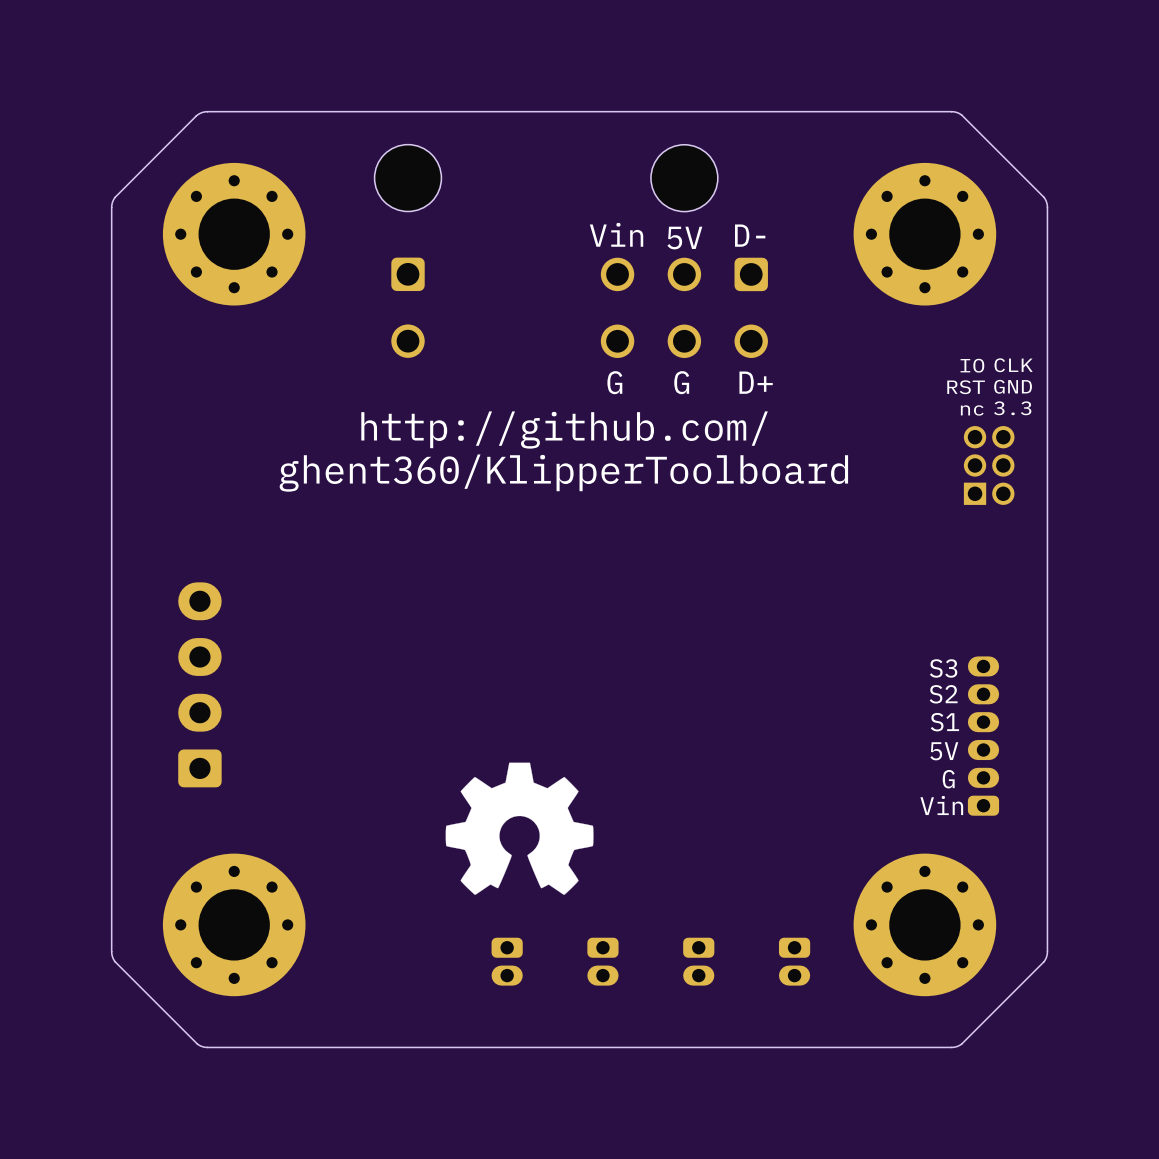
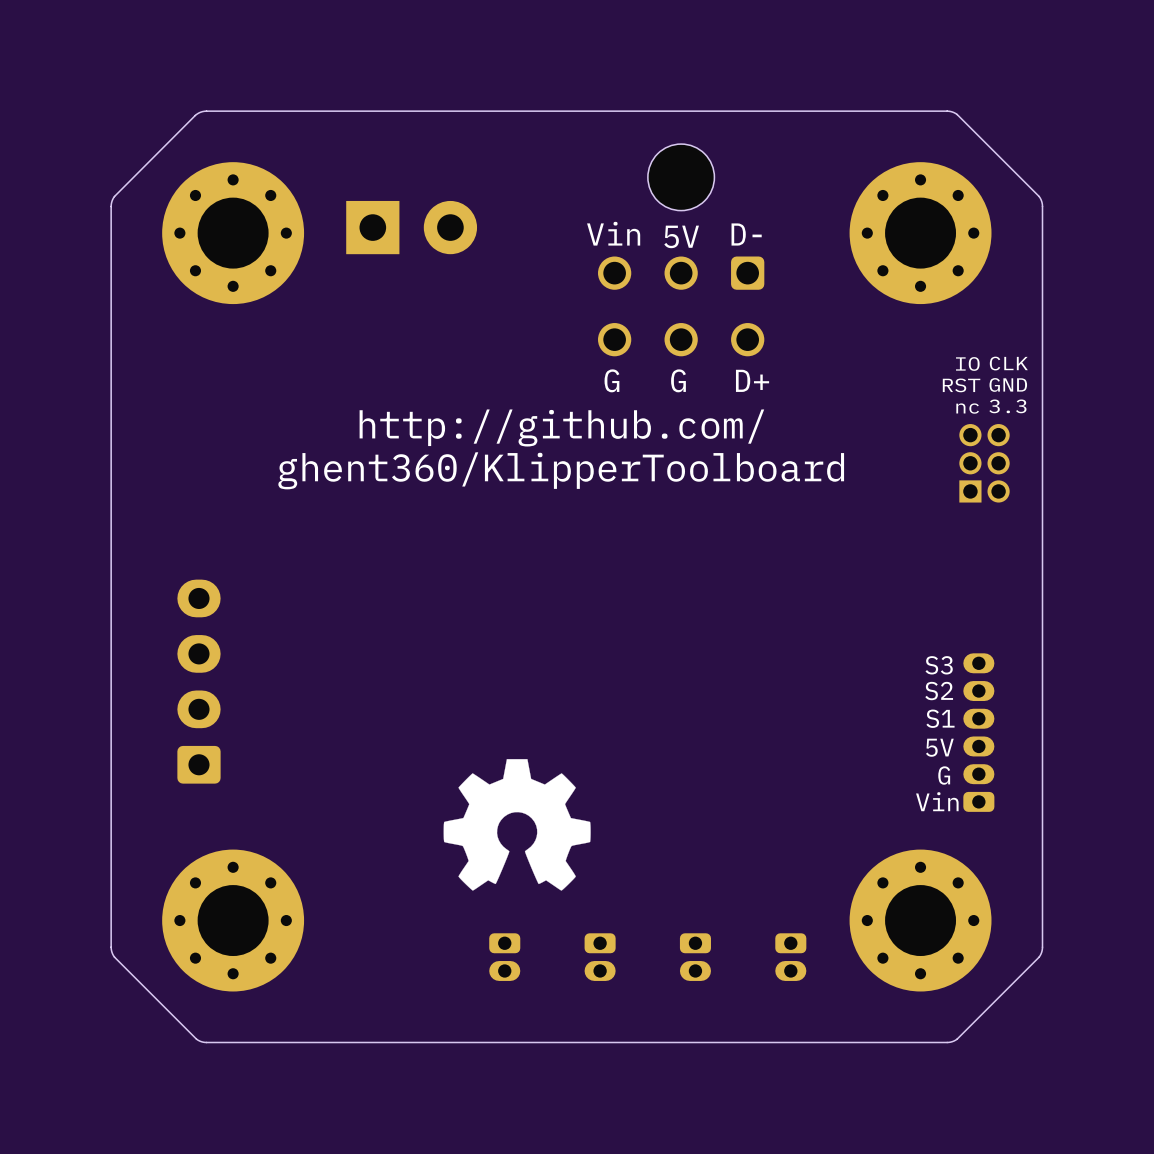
part: none -> (411, 227)
part: (408, 251) -> none

